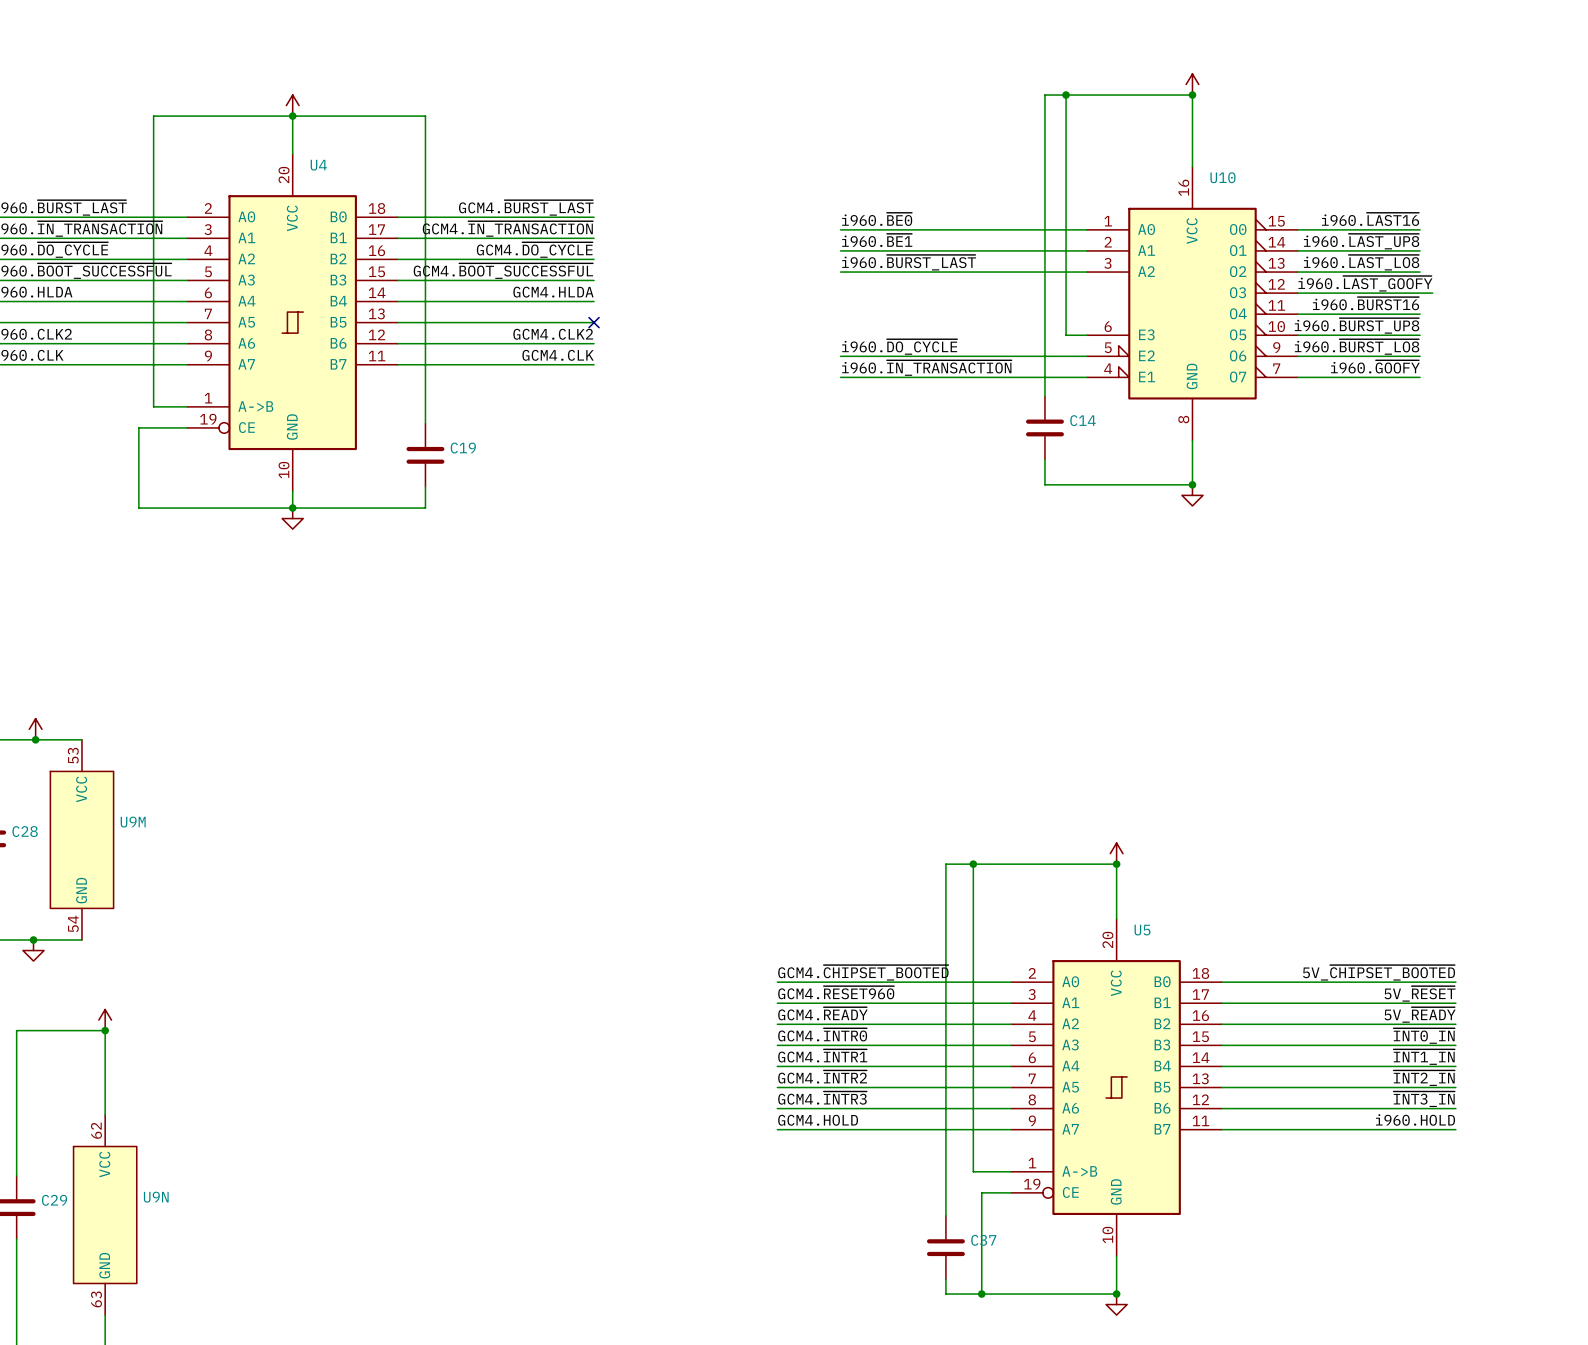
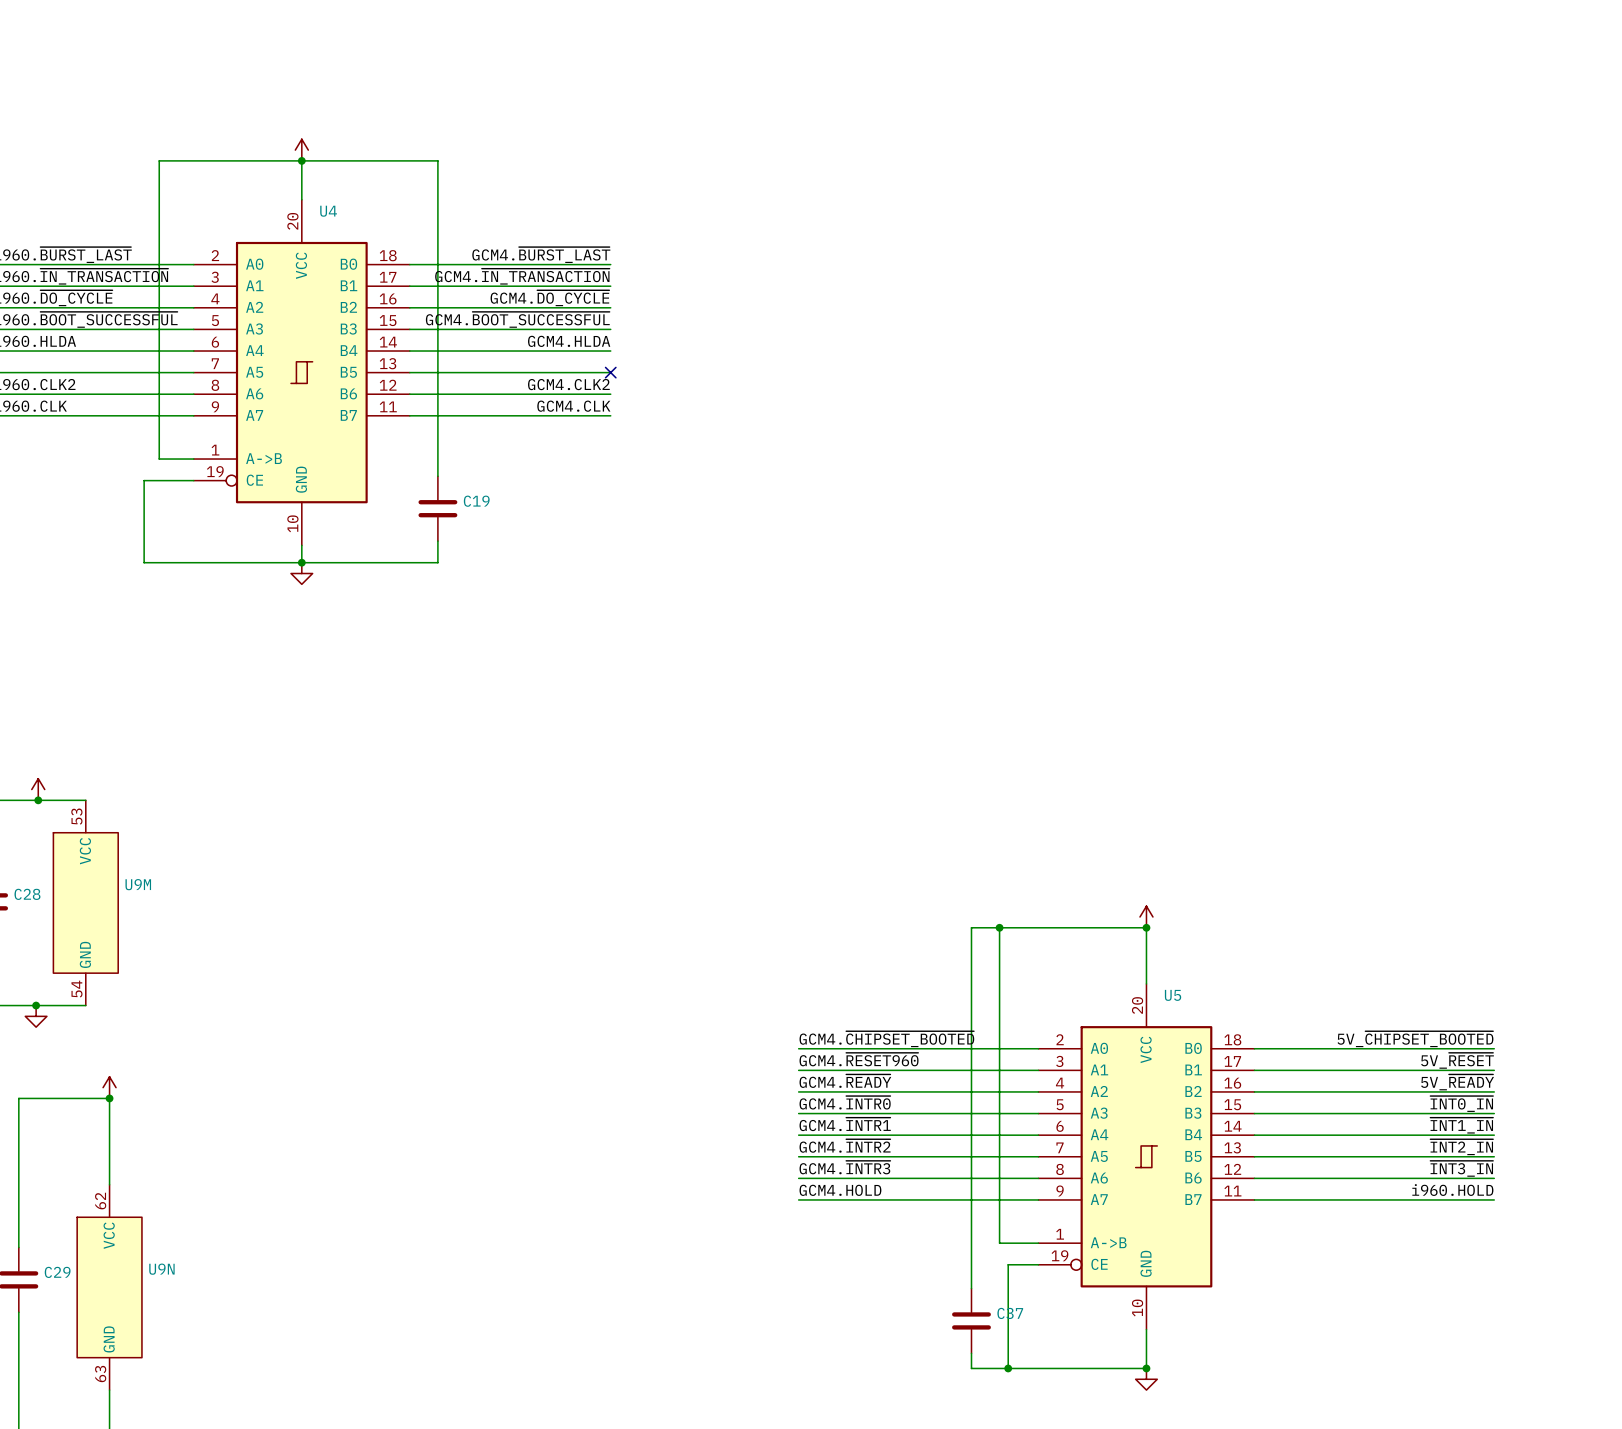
power symbol: (1192, 84) -> none
wire: (1066, 95) (1066, 335) (1087, 335) -> none
junction: (1066, 95) -> none
junction: (1192, 95) -> none
wire: (1192, 166) (1192, 95) (1044, 95) (1044, 396) -> none
label: i960.~{BE0} (877, 219) -> none
label: i960.~{LAST16} (1370, 219) -> none
wire: (840, 229) (1087, 229) -> none
wire: (1297, 229) (1420, 229) -> none
label: i960.~{BE1} (877, 240) -> none
label: i960.~{LAST_UP8} (1361, 241) -> none
wire: (840, 250) (1087, 250) -> none
wire: (1297, 250) (1420, 250) -> none
label: i960.~{BURST_LAST} (909, 262) -> none
label: i960.~{LAST_LO8} (1361, 262) -> none
wire: (840, 272) (1087, 272) -> none
wire: (1297, 272) (1420, 272) -> none
label: i960.~{LAST_GOOFY} (1365, 283) -> none
wire: (1297, 293) (1432, 293) -> none
U10: (1192, 303) -> none
label: i960.~{BURST16} (1366, 303) -> none
wire: (1297, 314) (1420, 314) -> none
label: i960.~{BURST_UP8} (1357, 325) -> none
wire: (1297, 335) (1420, 335) -> none
label: i960.~{DO_CYCLE} (899, 346) -> none
label: i960.~{BURST_LO8} (1357, 346) -> none
wire: (840, 356) (1087, 356) -> none
wire: (1297, 356) (1420, 356) -> none
label: i960.~{GOOFY} (1375, 366) -> none
label: i960.~{IN_TRANSACTION} (926, 368) -> none
wire: (840, 377) (1087, 377) -> none
wire: (1297, 377) (1420, 377) -> none
C14: (1044, 427) -> none
wire: (1192, 440) (1192, 484) (1044, 484) (1044, 459) -> none
junction: (1192, 484) -> none
power symbol: (1192, 495) -> none

